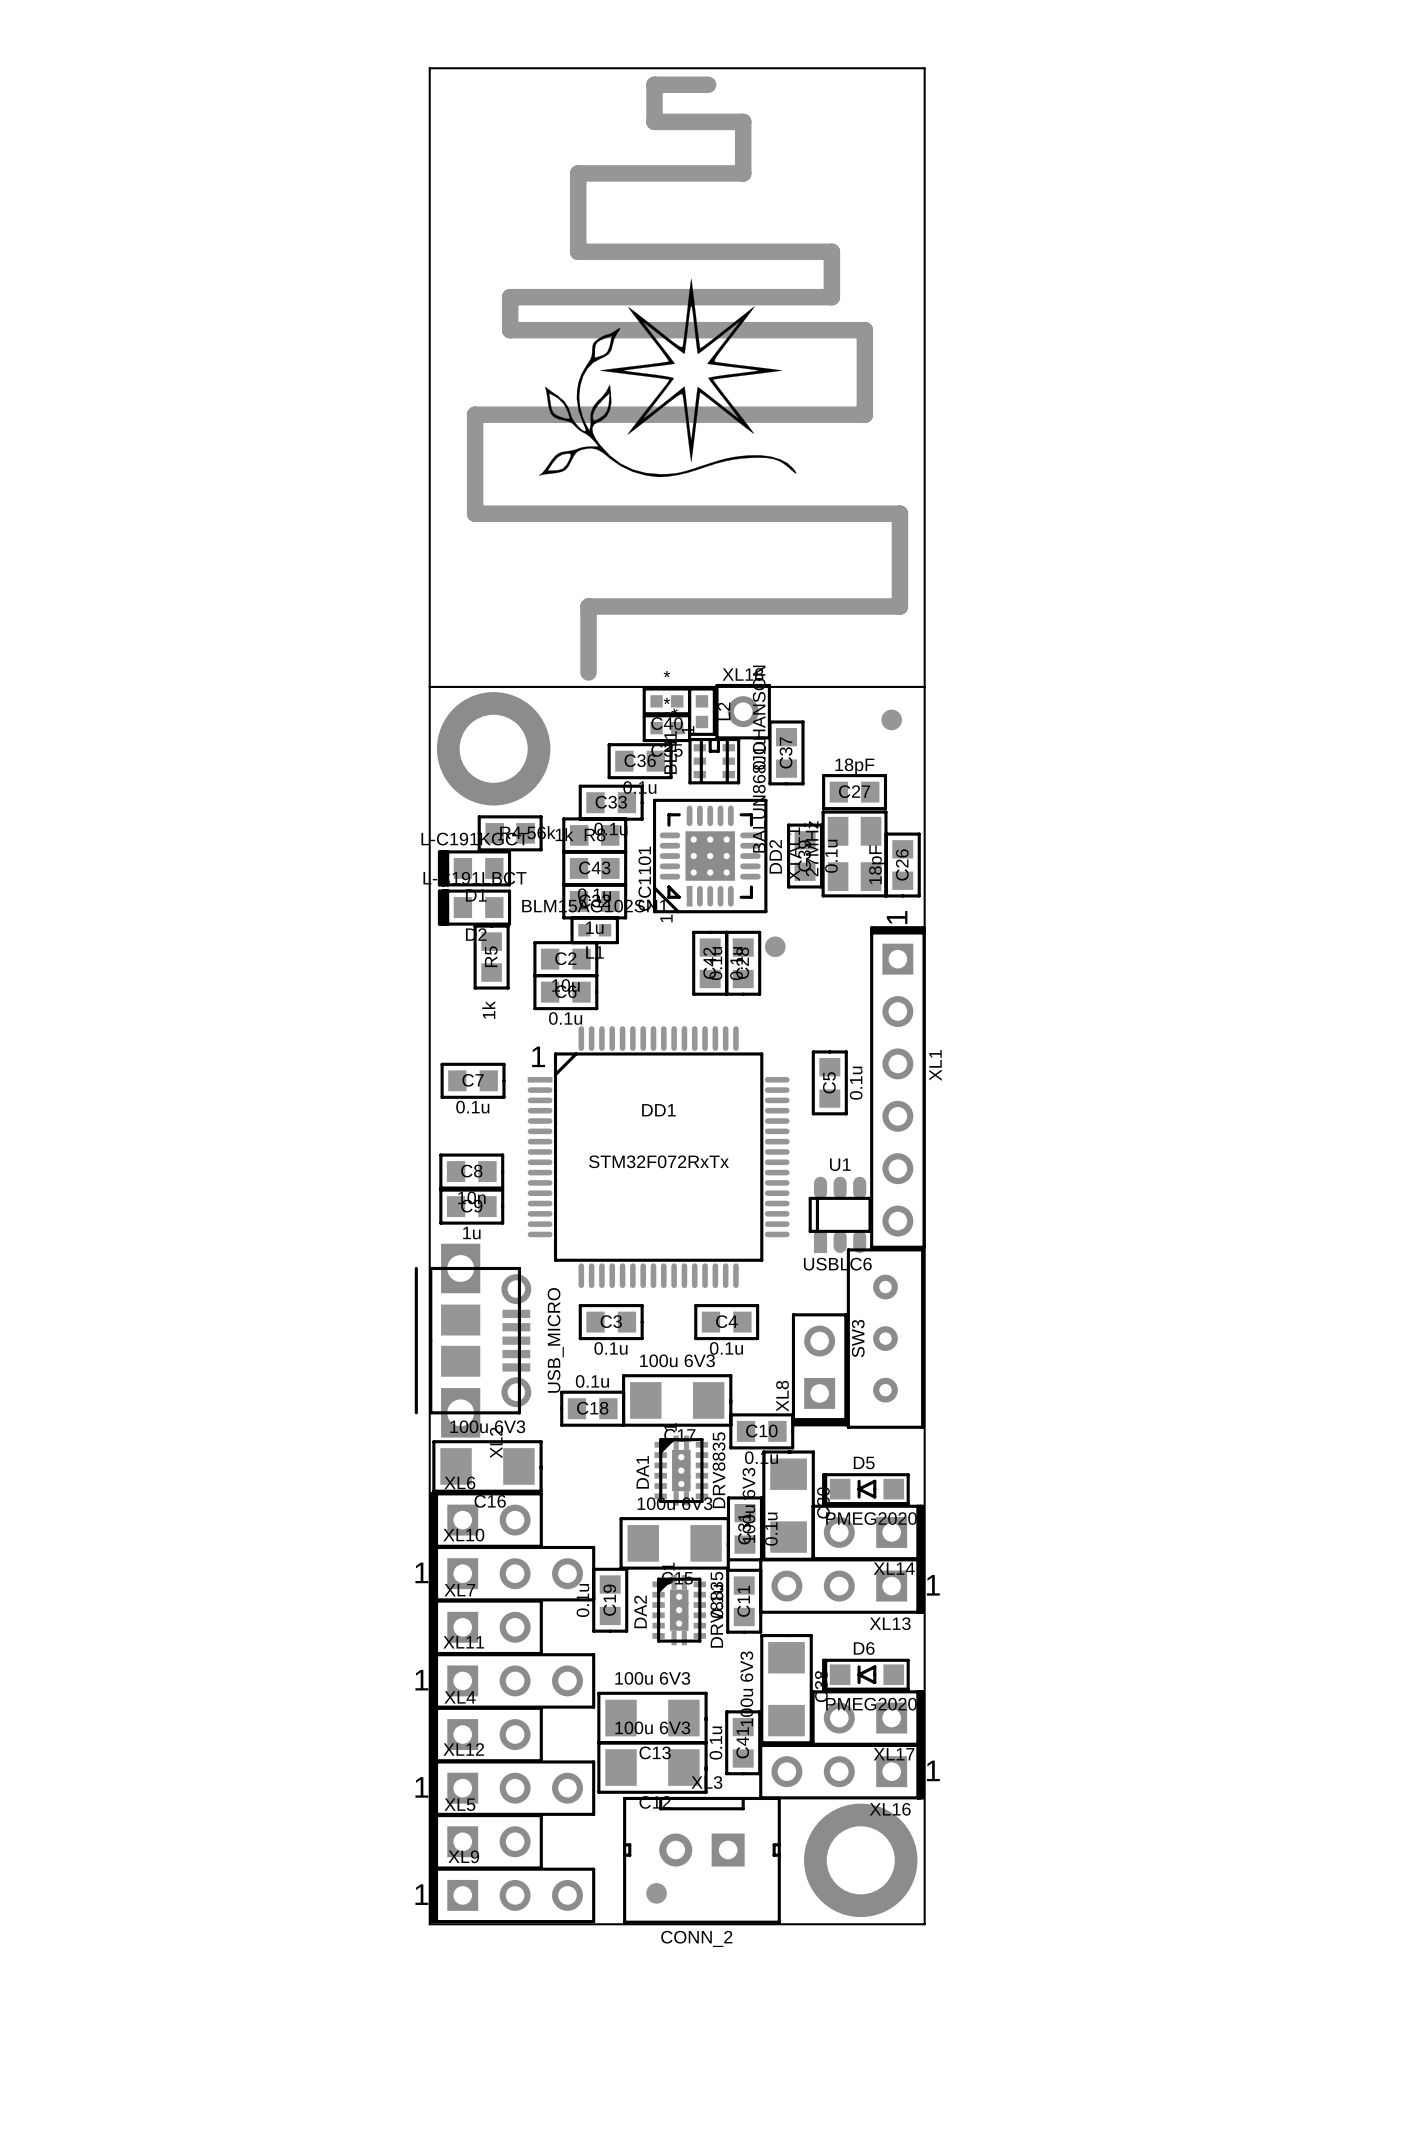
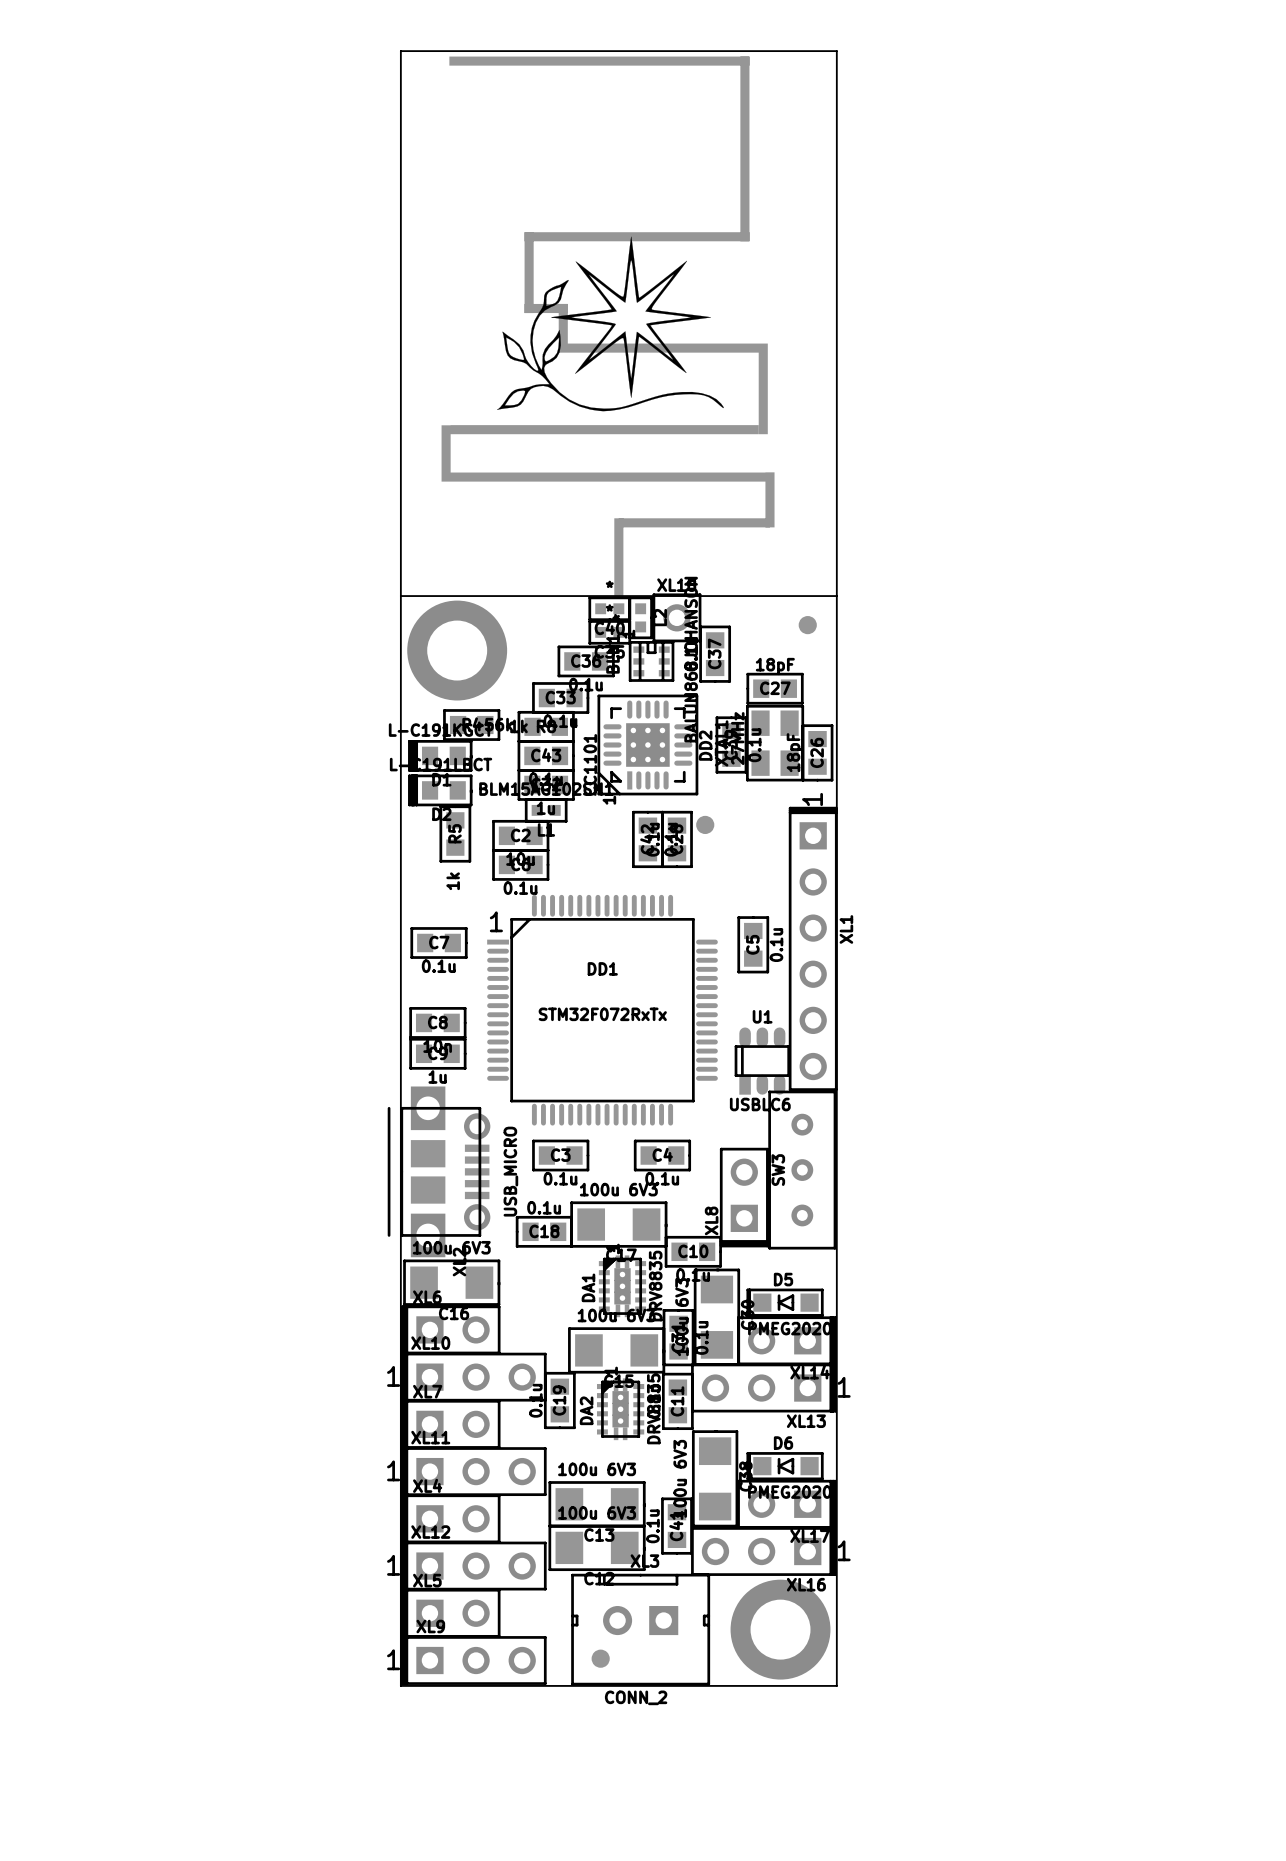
part: (687, 378) -> none
part: none -> (608, 326)

